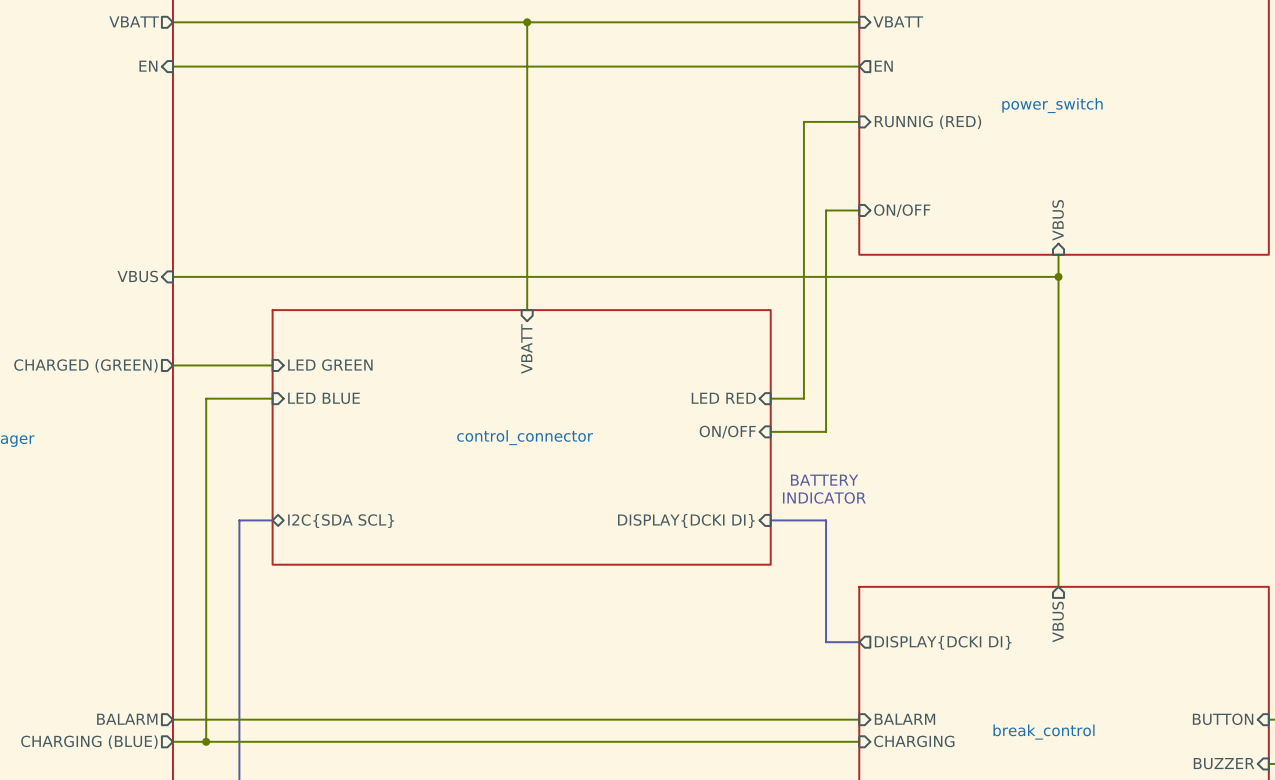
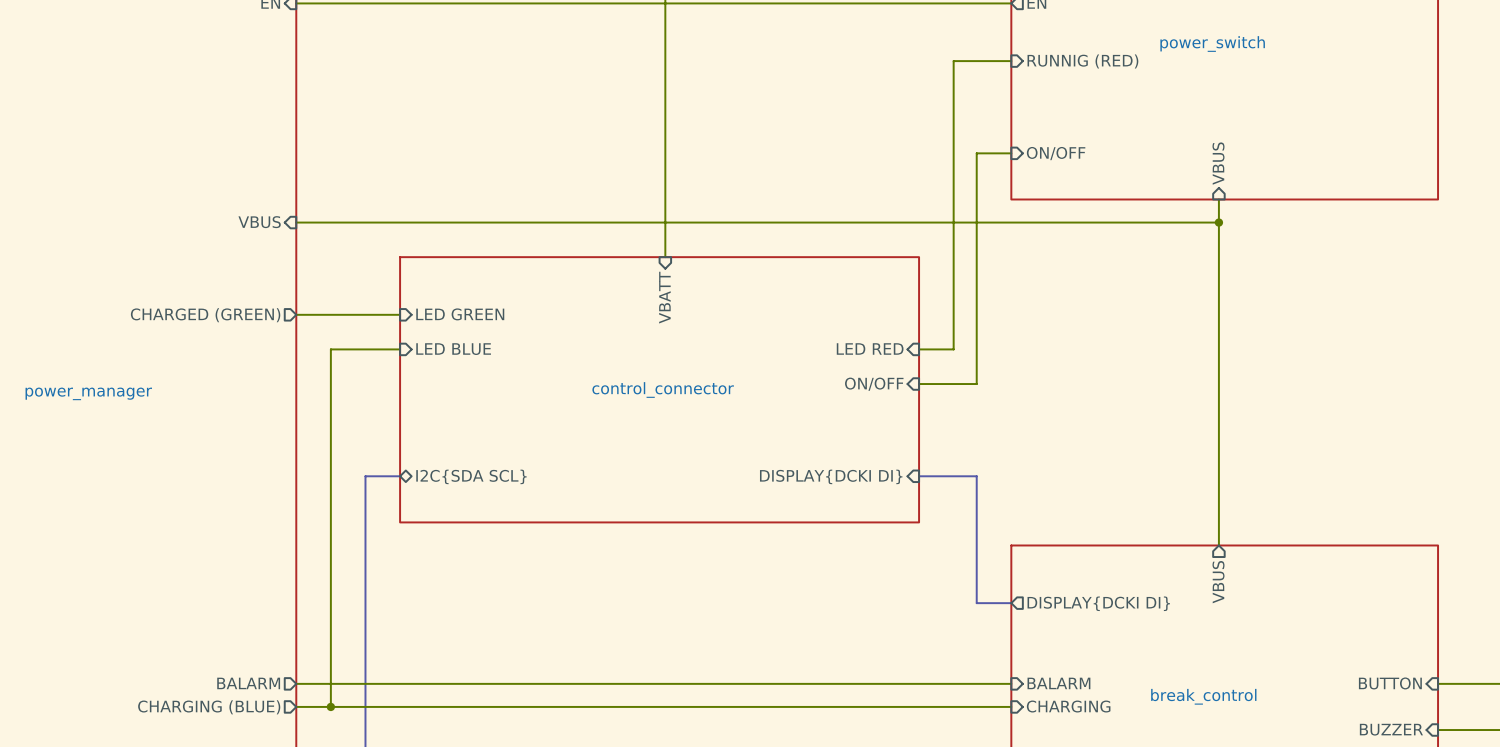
text: BATTERY (824, 480) -> none
text: INDICATOR (824, 497) -> none

